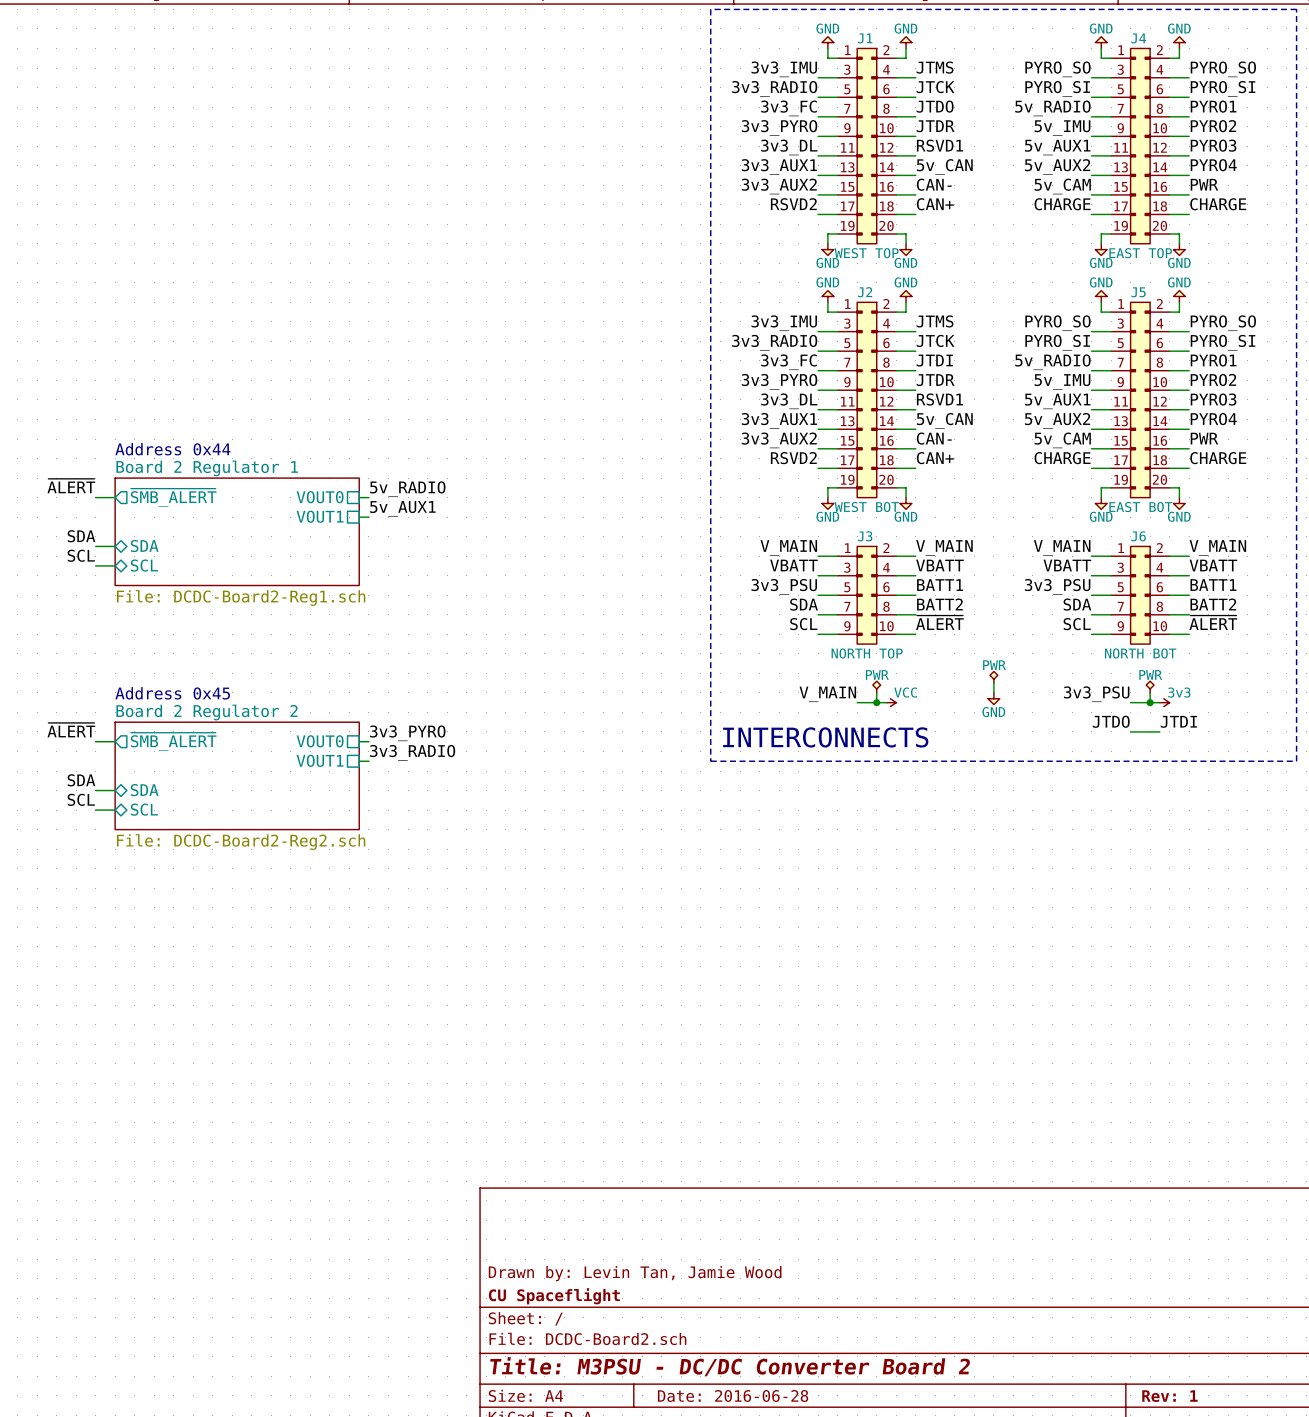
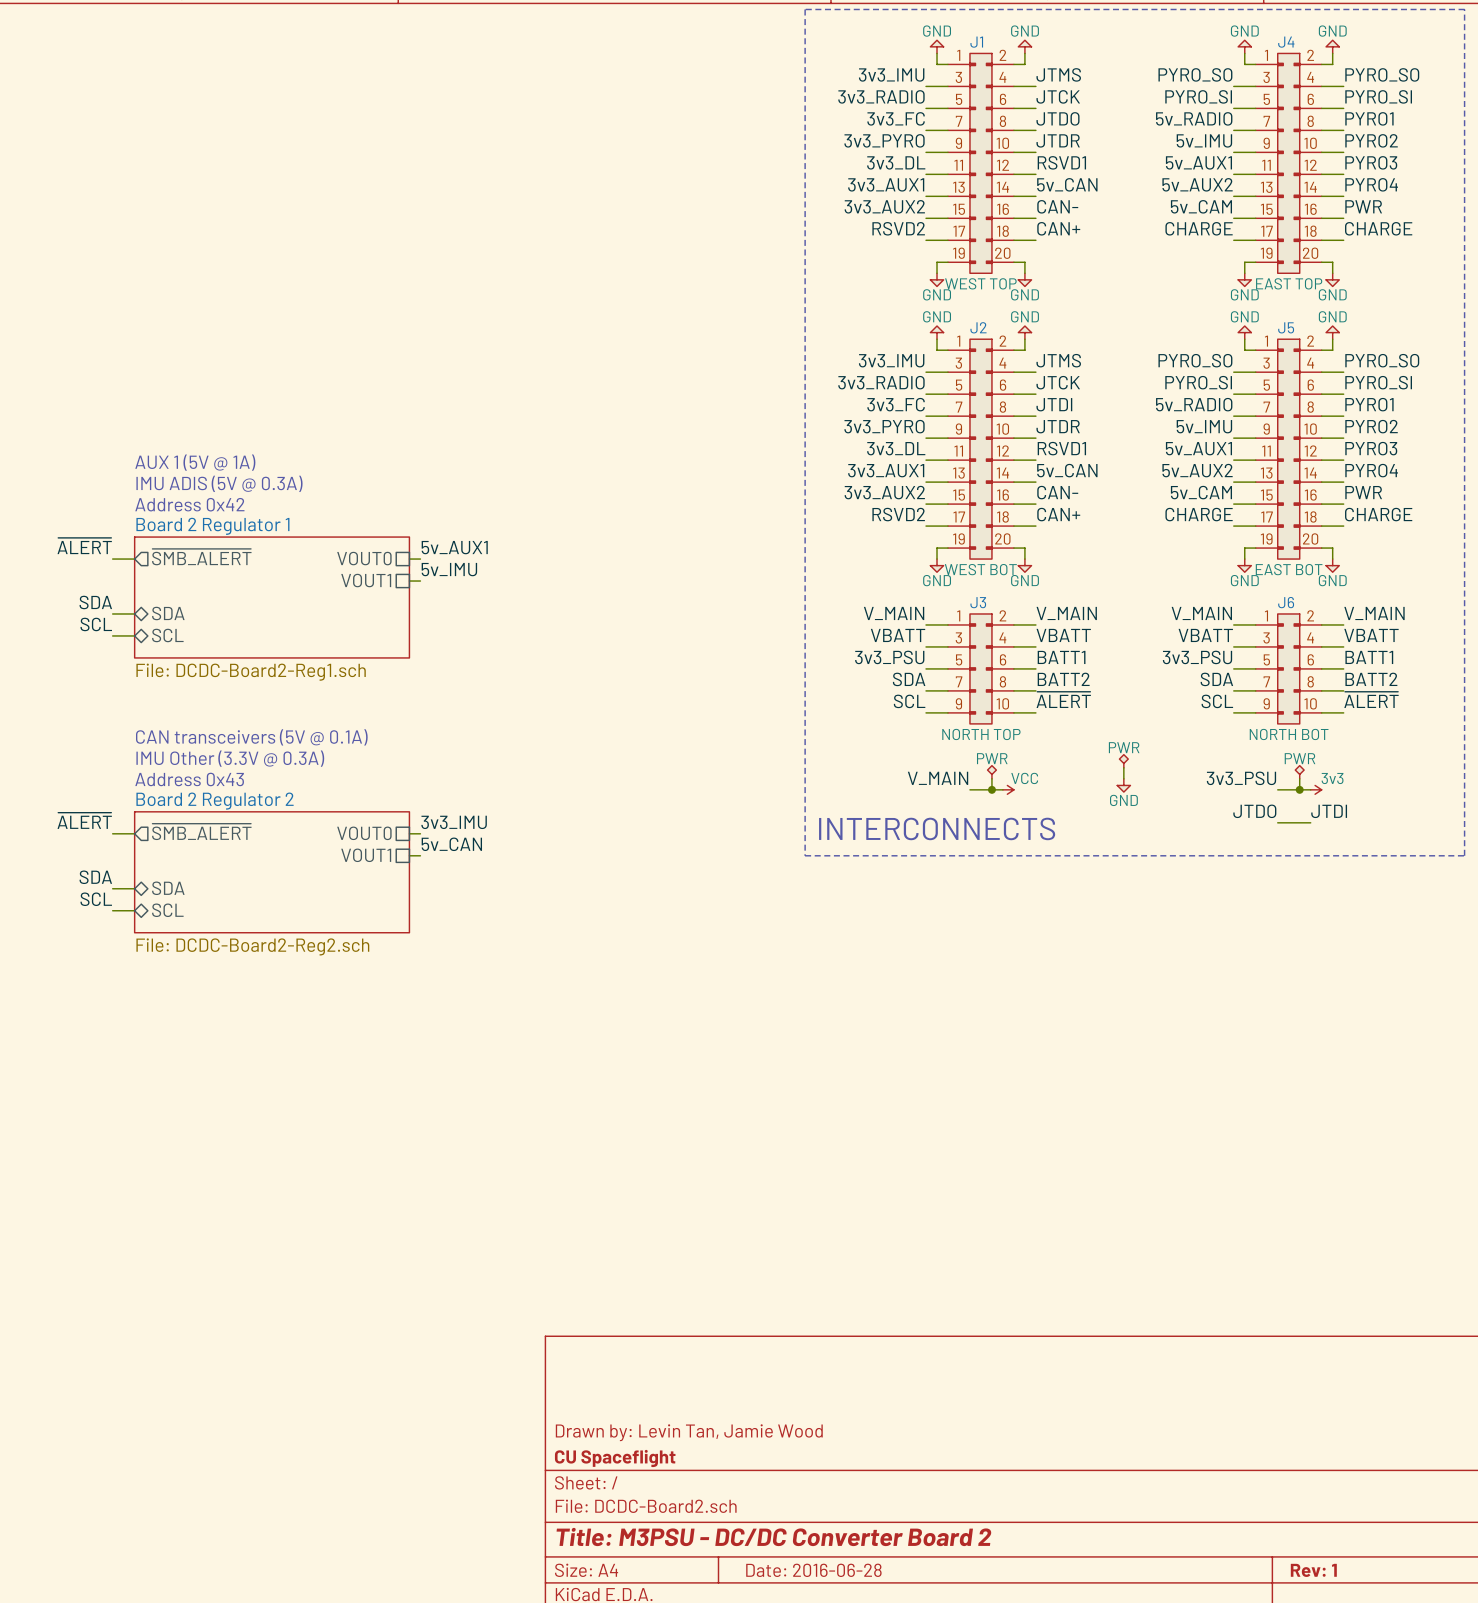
text: none -> AUX 1 (5V @ 1A) (195, 462)
text: none -> IMU ADIS (5V @ 0.3A) (219, 483)
text: Address 0x44 (172, 449) -> Address 0x42 (189, 504)
label: 5v_RADIO (407, 489) -> 5v_AUX1 (454, 547)
label: 5v_AUX1 (402, 508) -> 5v_IMU (449, 569)
text: none -> CAN transceivers (5V @ 0.1A) (251, 737)
text: none -> IMU Other (3.3V @ 0.3A) (230, 758)
text: Address 0x45 (172, 693) -> Address 0x43 (189, 779)
label: 3v3_PYRO (407, 733) -> 3v3_IMU (454, 822)
label: 3v3_RADIO (412, 752) -> 5v_CAN (451, 844)

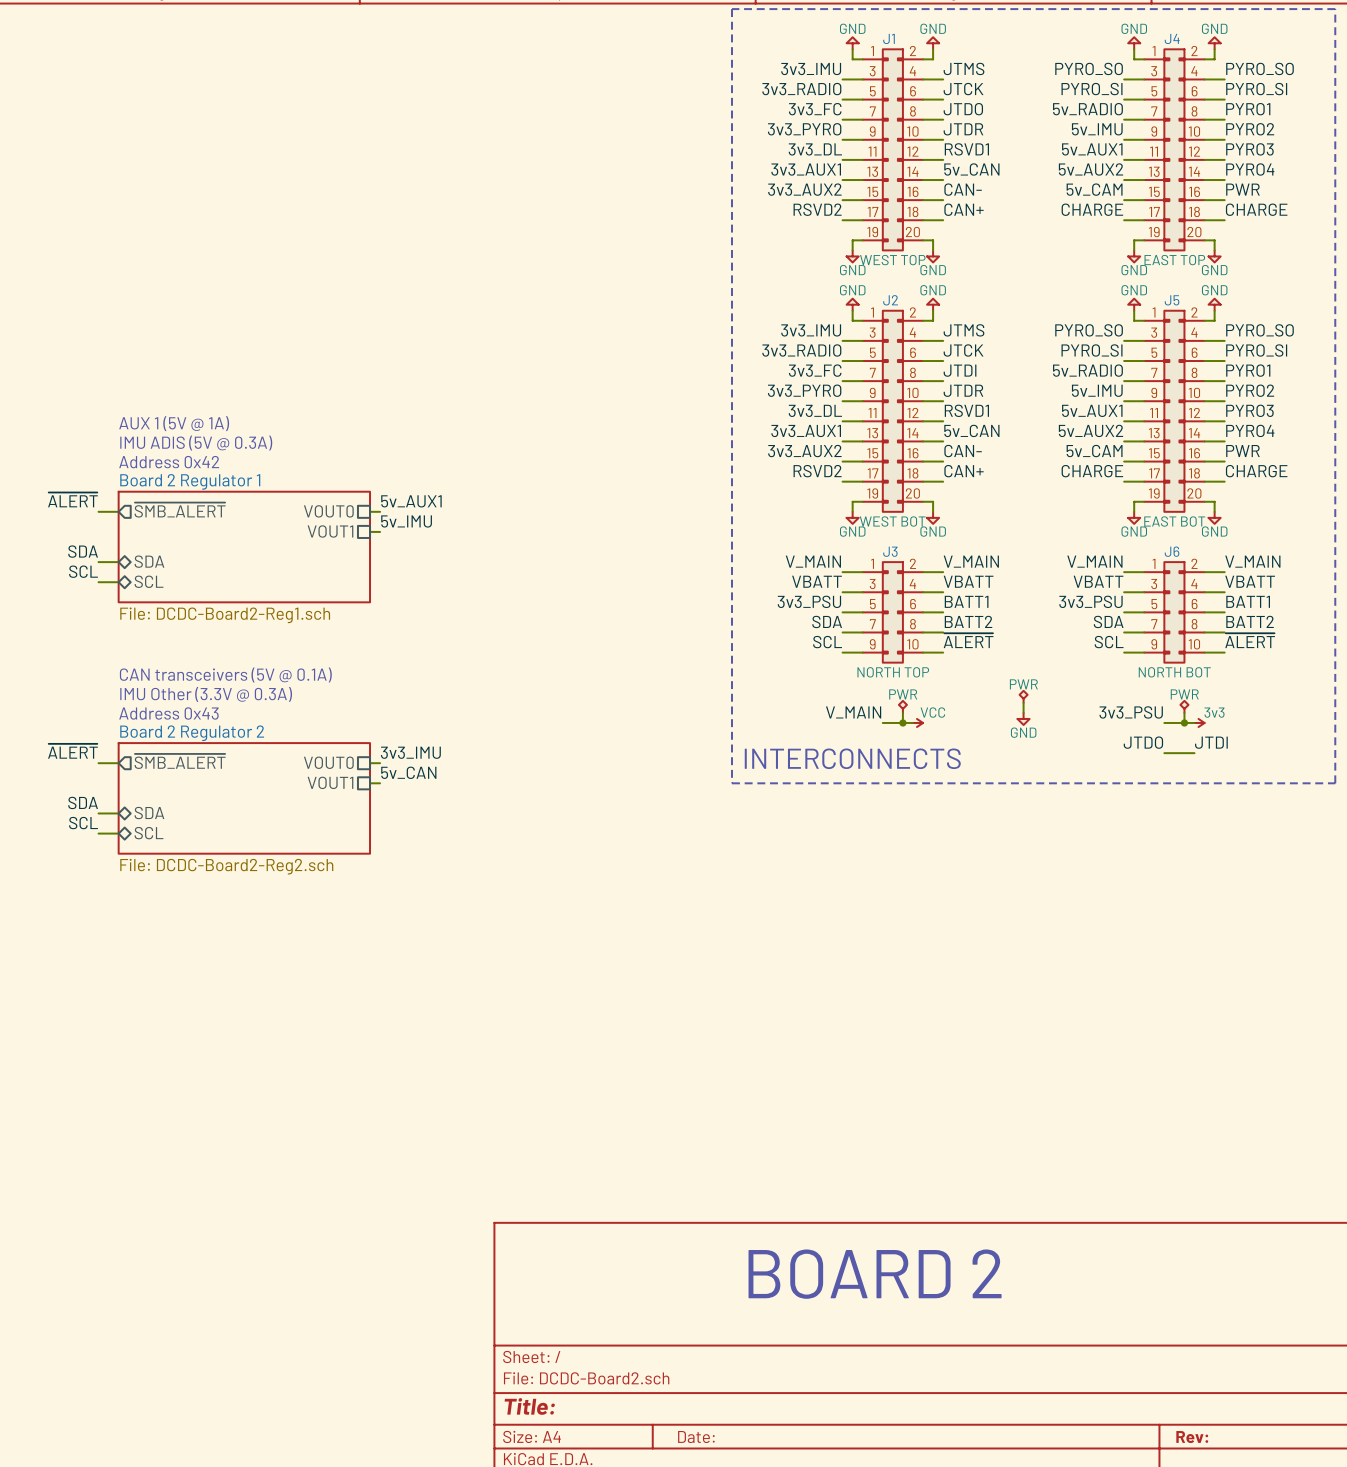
text: none -> BOARD 2 (875, 1274)
title block: Drawn by: Levin Tan, Jamie Wood (689, 1432) -> none
title block: CU Spaceflight (615, 1458) -> none
title block: Title: M3PSU - DC/DC Converter Board 2 (773, 1536) -> Title: (529, 1406)
title block: Date: 2016-06-28 (813, 1570) -> Date: (696, 1437)
title block: Rev: 1 (1313, 1570) -> Rev: (1192, 1437)

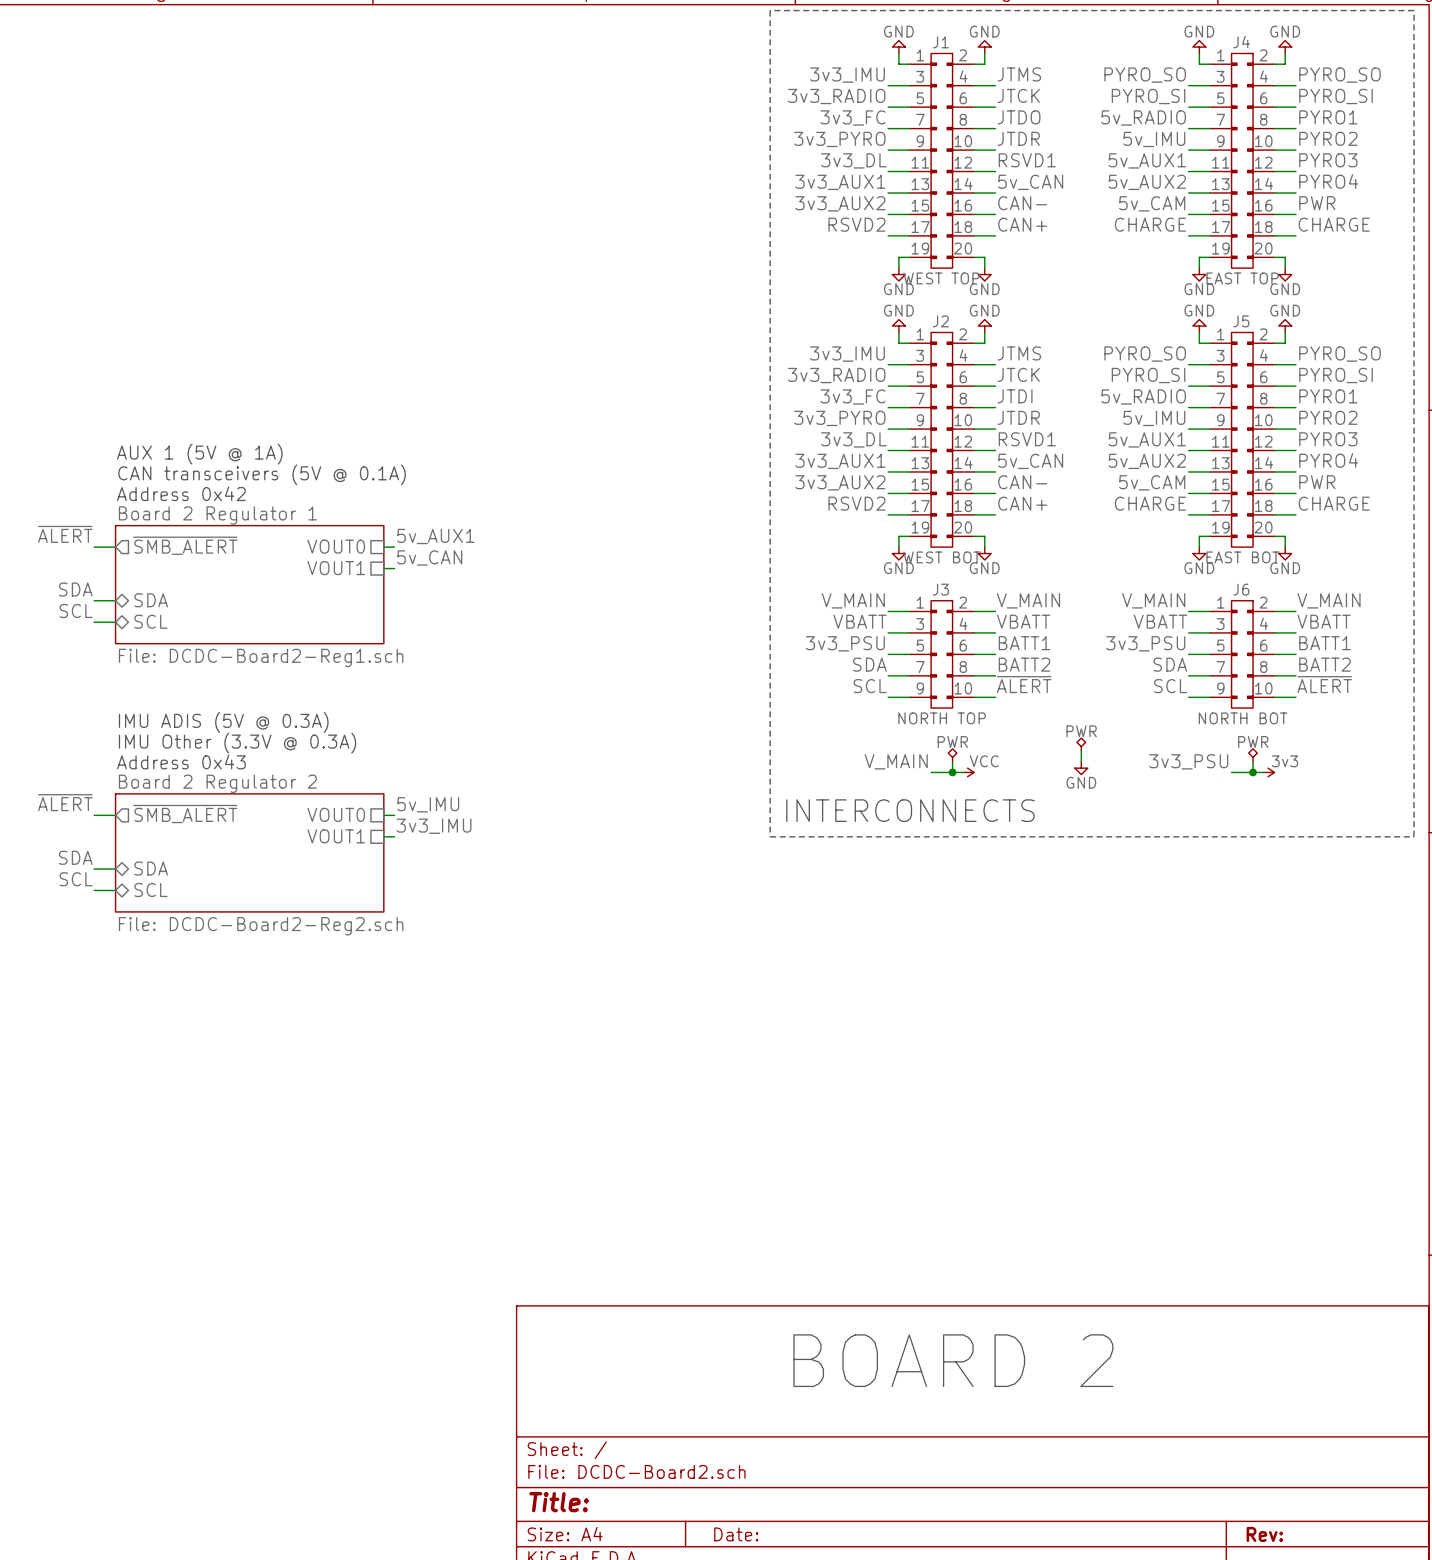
text: IMU ADIS (5V @ 0.3A) (196, 443) -> CAN transceivers (5V @ 0.1A) (262, 474)
label: 5v_IMU (406, 521) -> 5v_CAN (429, 557)
text: CAN transceivers (5V @ 0.1A) (225, 674) -> IMU ADIS (5V @ 0.3A) (223, 722)
label: JTDO (1143, 742) -> none
label: JTDI (1211, 742) -> none
label: 3v3_IMU (410, 752) -> 5v_IMU (428, 804)
wire: (1164, 753) (1194, 753) -> none
label: 5v_CAN (408, 772) -> 3v3_IMU (434, 826)

